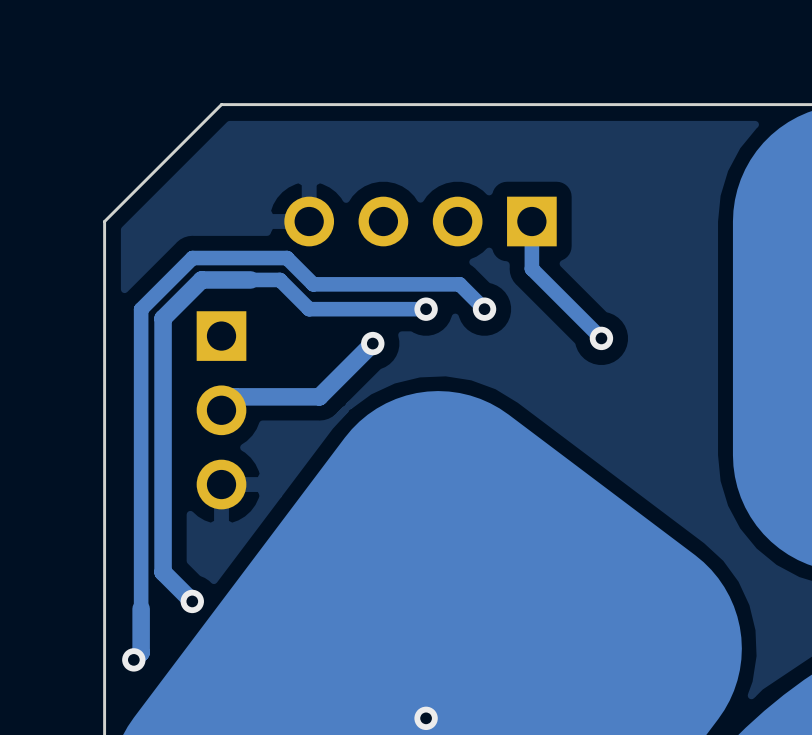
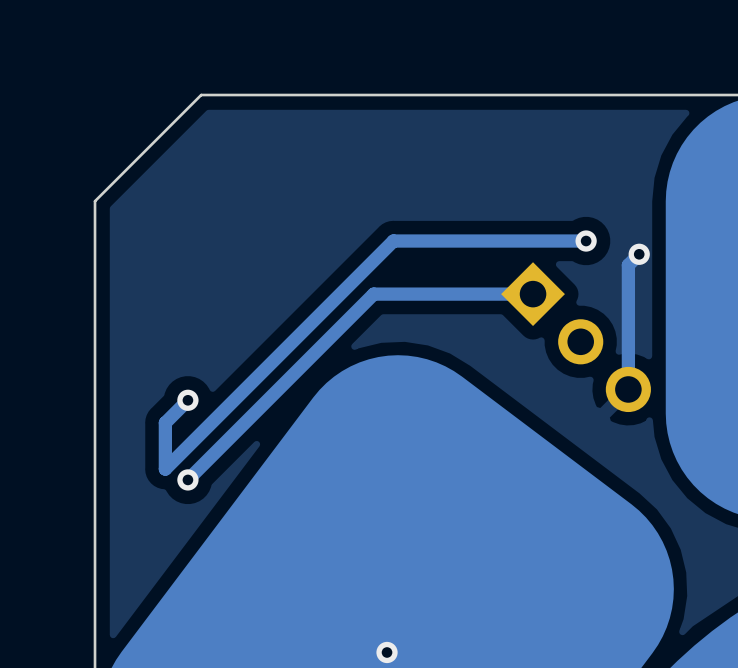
part: (420, 221) -> none
track: (531, 221) (531, 268) (601, 338) -> none
track: none -> (586, 241) (393, 241) (165, 469) (165, 422) (187, 400)
via: none -> (586, 241)
track: none -> (639, 254) (628, 265) (628, 389)
via: none -> (639, 254)
track: (426, 309) (309, 309) (279, 279) (201, 279) (163, 318) (163, 572) (192, 601) -> none
via: (426, 309) -> none
track: (484, 309) (459, 284) (313, 284) (286, 258) (192, 258) (141, 309) (141, 652) (133, 659) -> none
via: (484, 309) -> none
track: none -> (533, 294) (373, 294) (187, 479)
via: (601, 338) -> none
track: (372, 343) (319, 396) (234, 396) (221, 410) -> none
via: (372, 343) -> none
part: none -> (576, 337)
part: (221, 410) -> none
via: none -> (187, 400)
via position: (192, 601) -> (187, 479)
via: (133, 659) -> none

